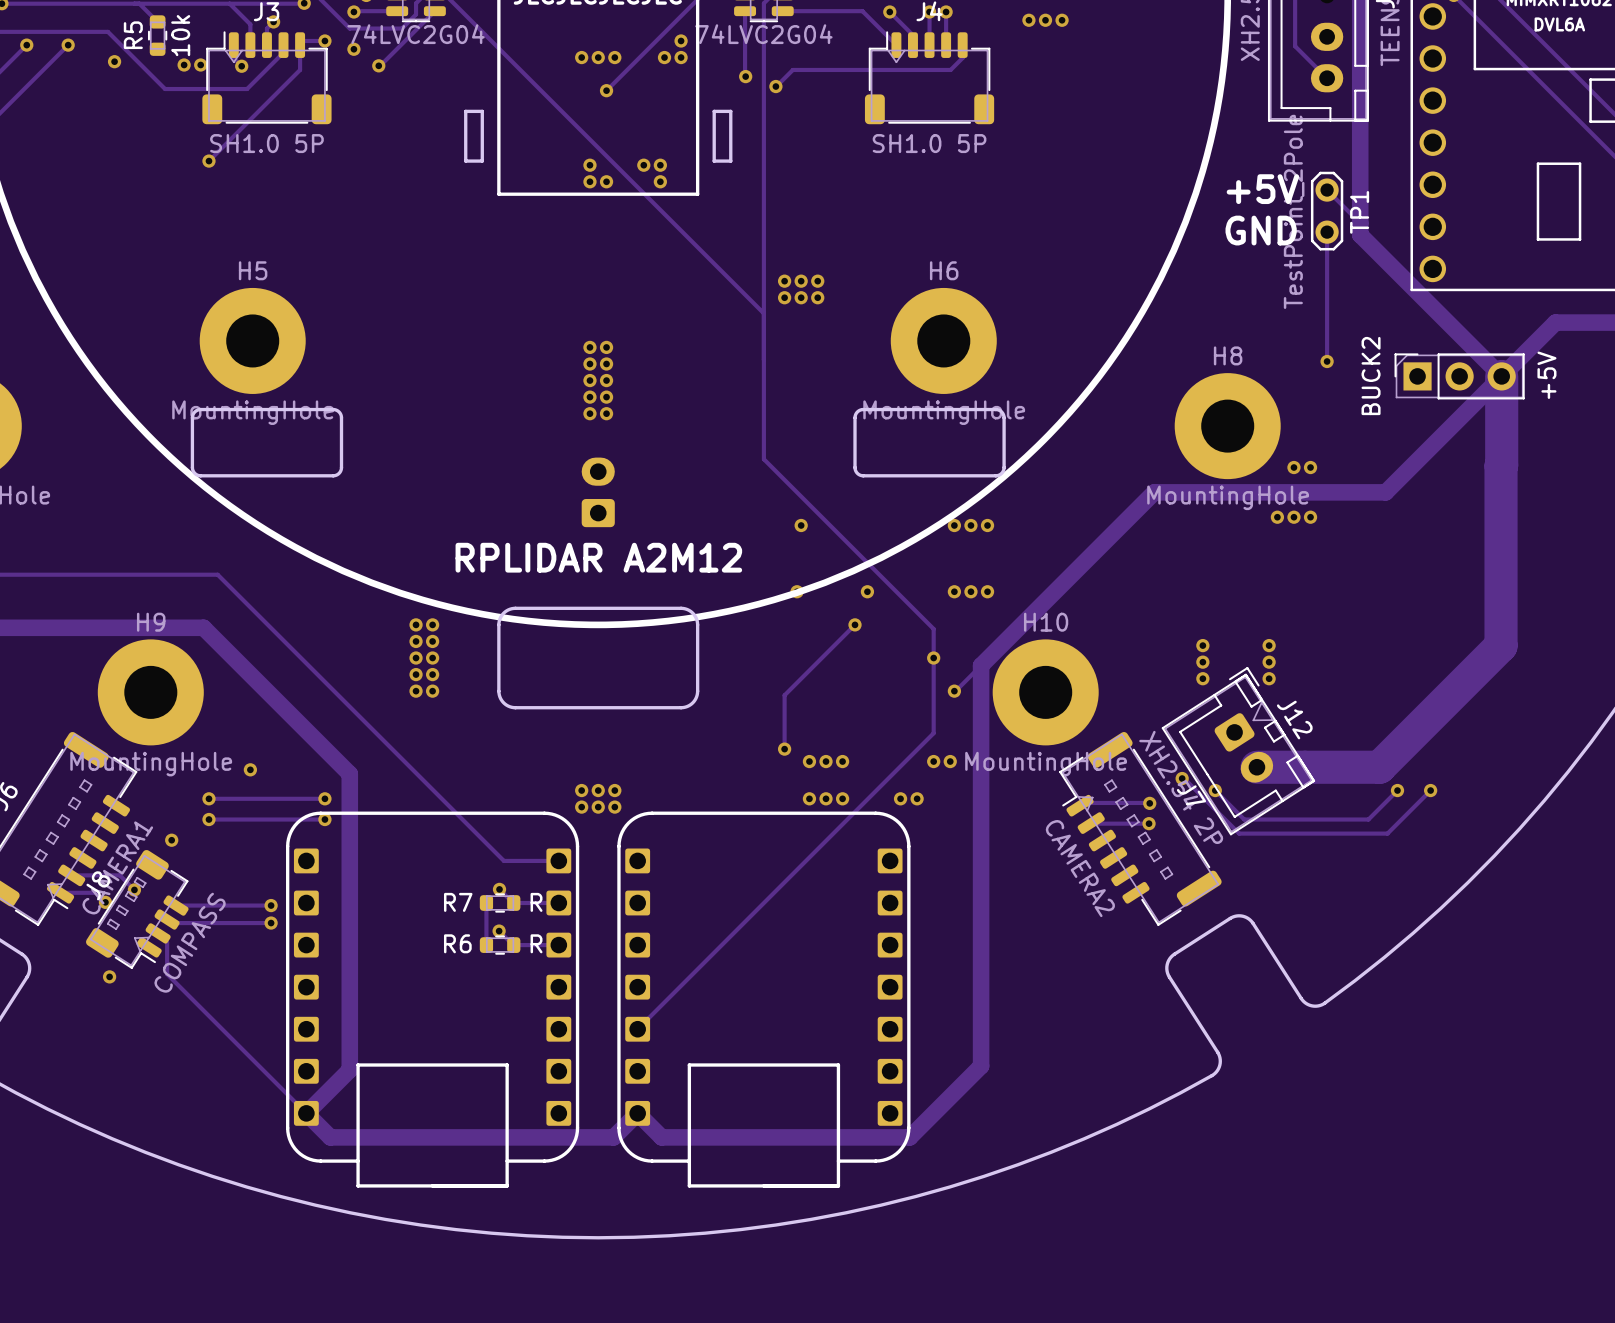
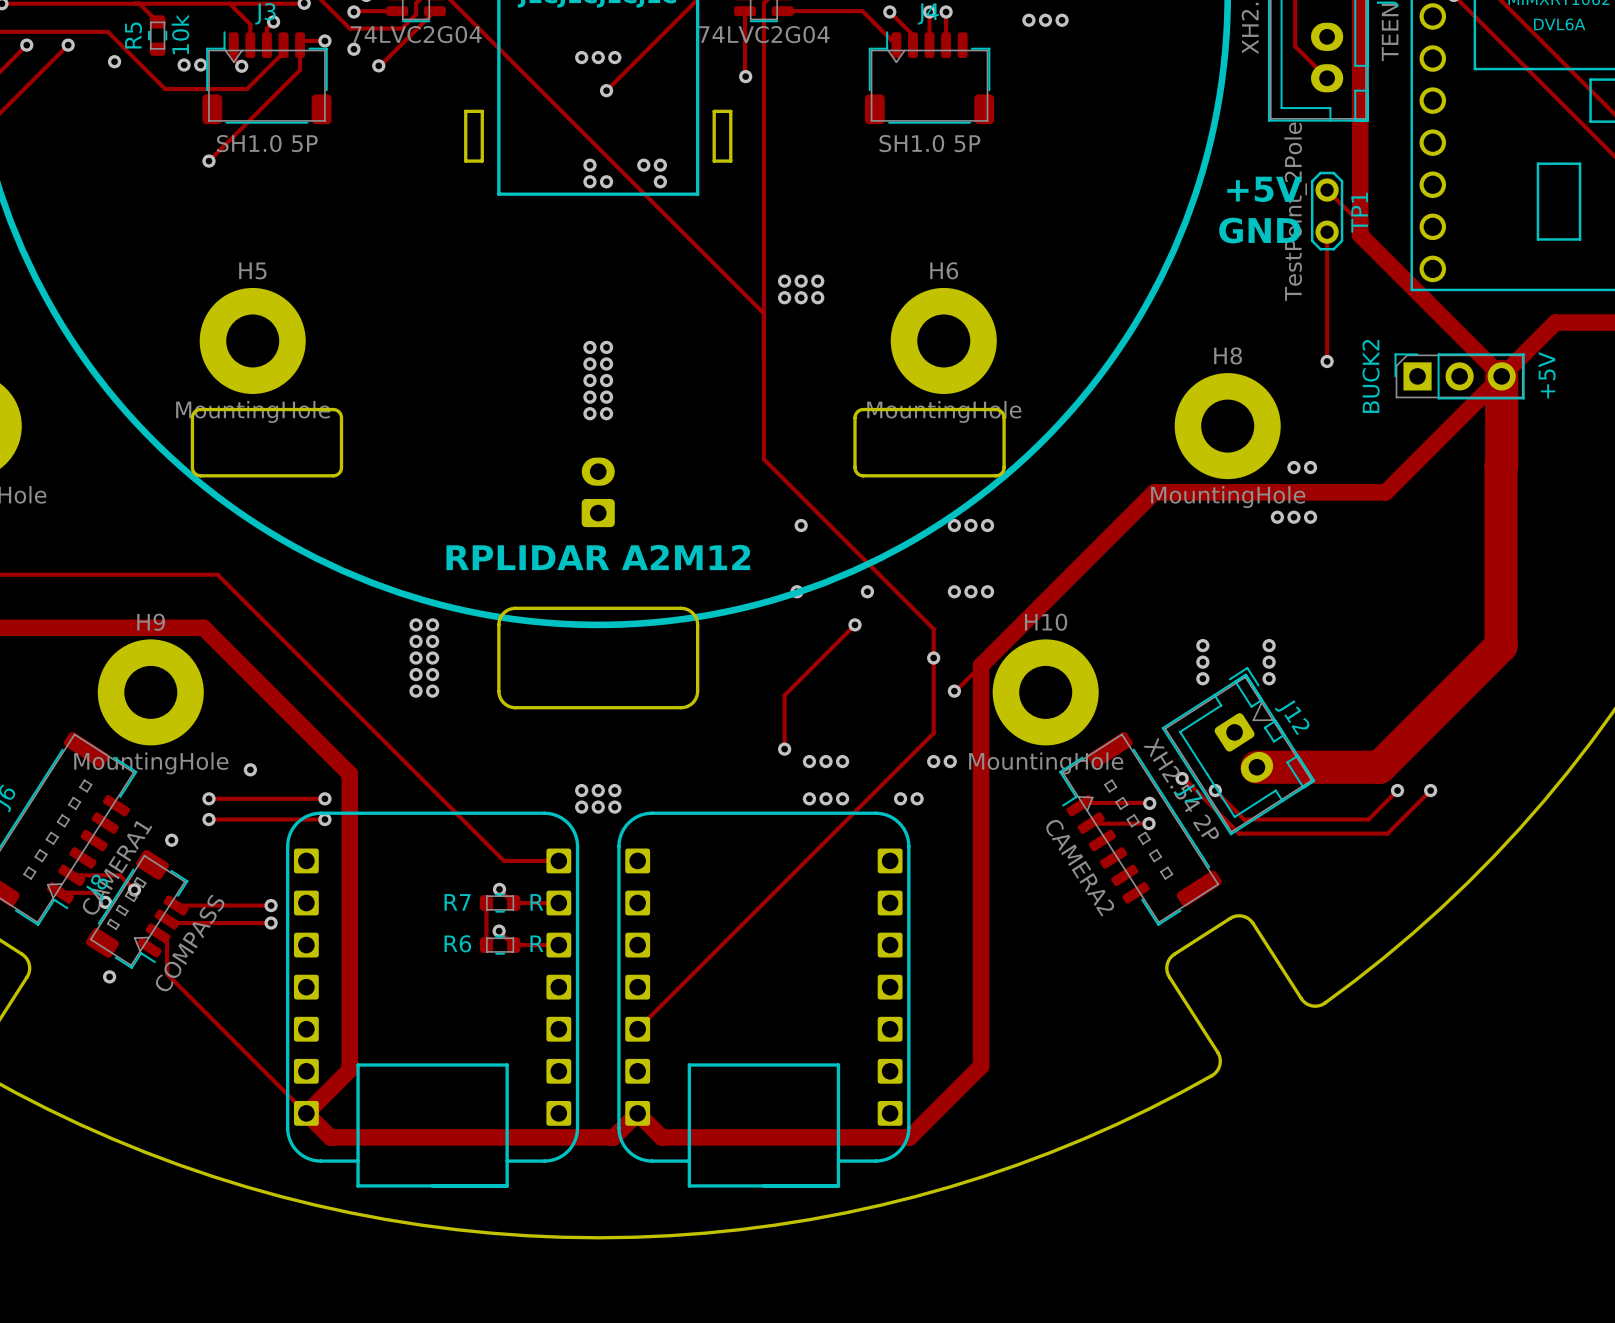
via: (681, 40) -> none
track: (962, 45) (962, 57) (950, 69) (792, 69) (775, 86) -> none
via: (664, 57) -> none
via: (681, 57) -> none
via: (775, 86) -> none

